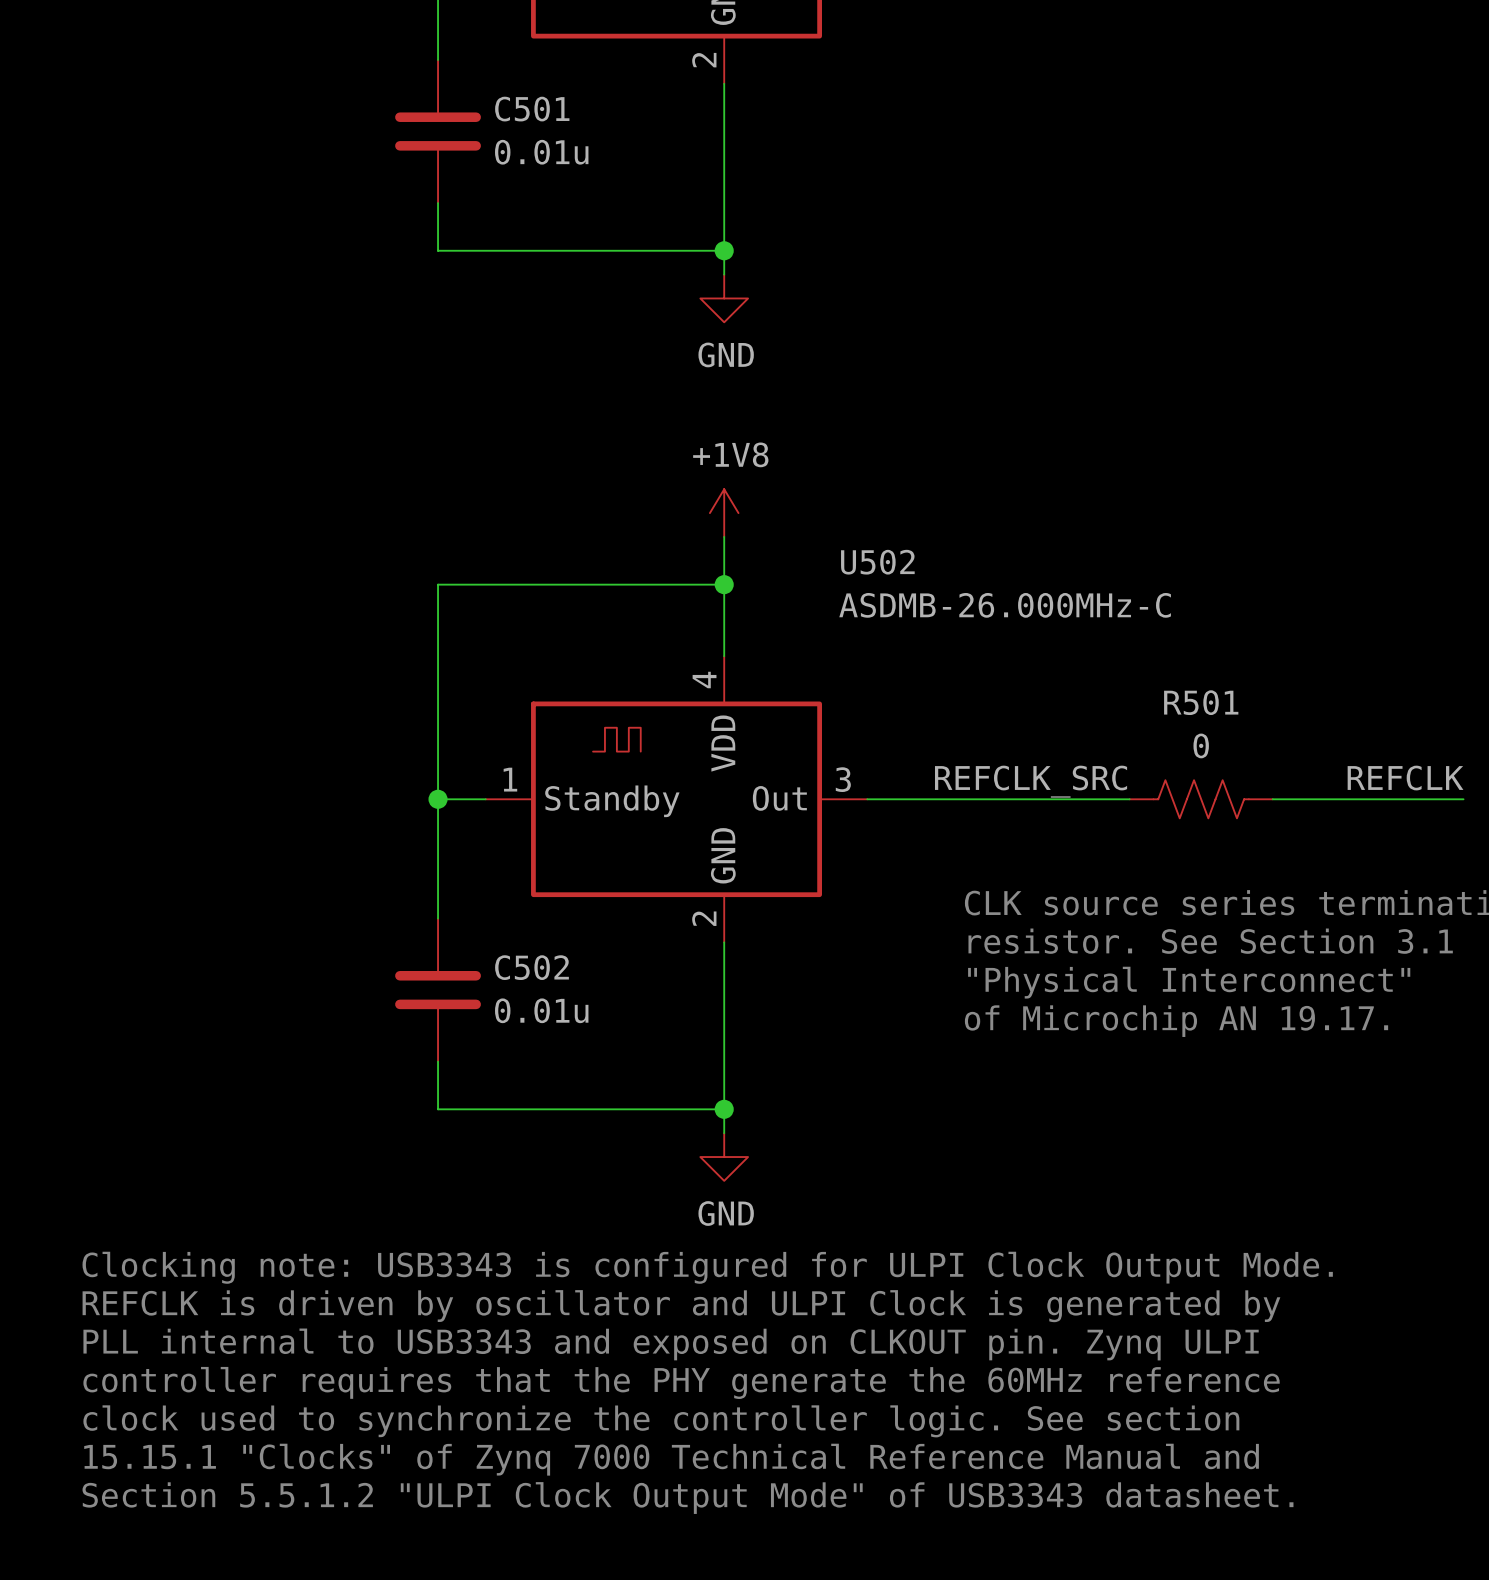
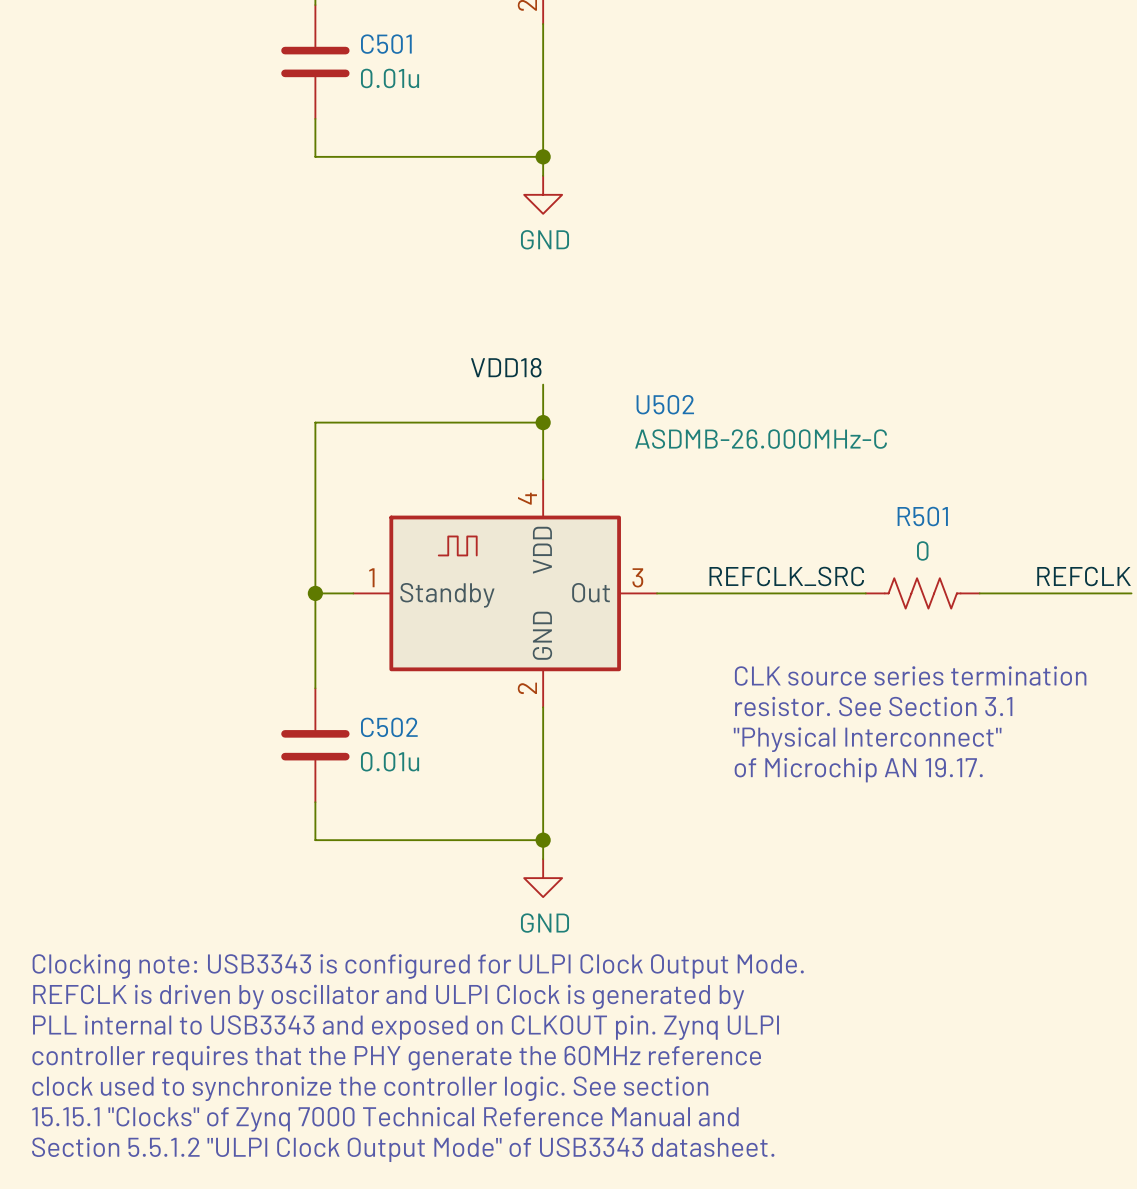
power symbol: +1V8 (724, 513) -> none
label: none -> VDD18 (506, 367)

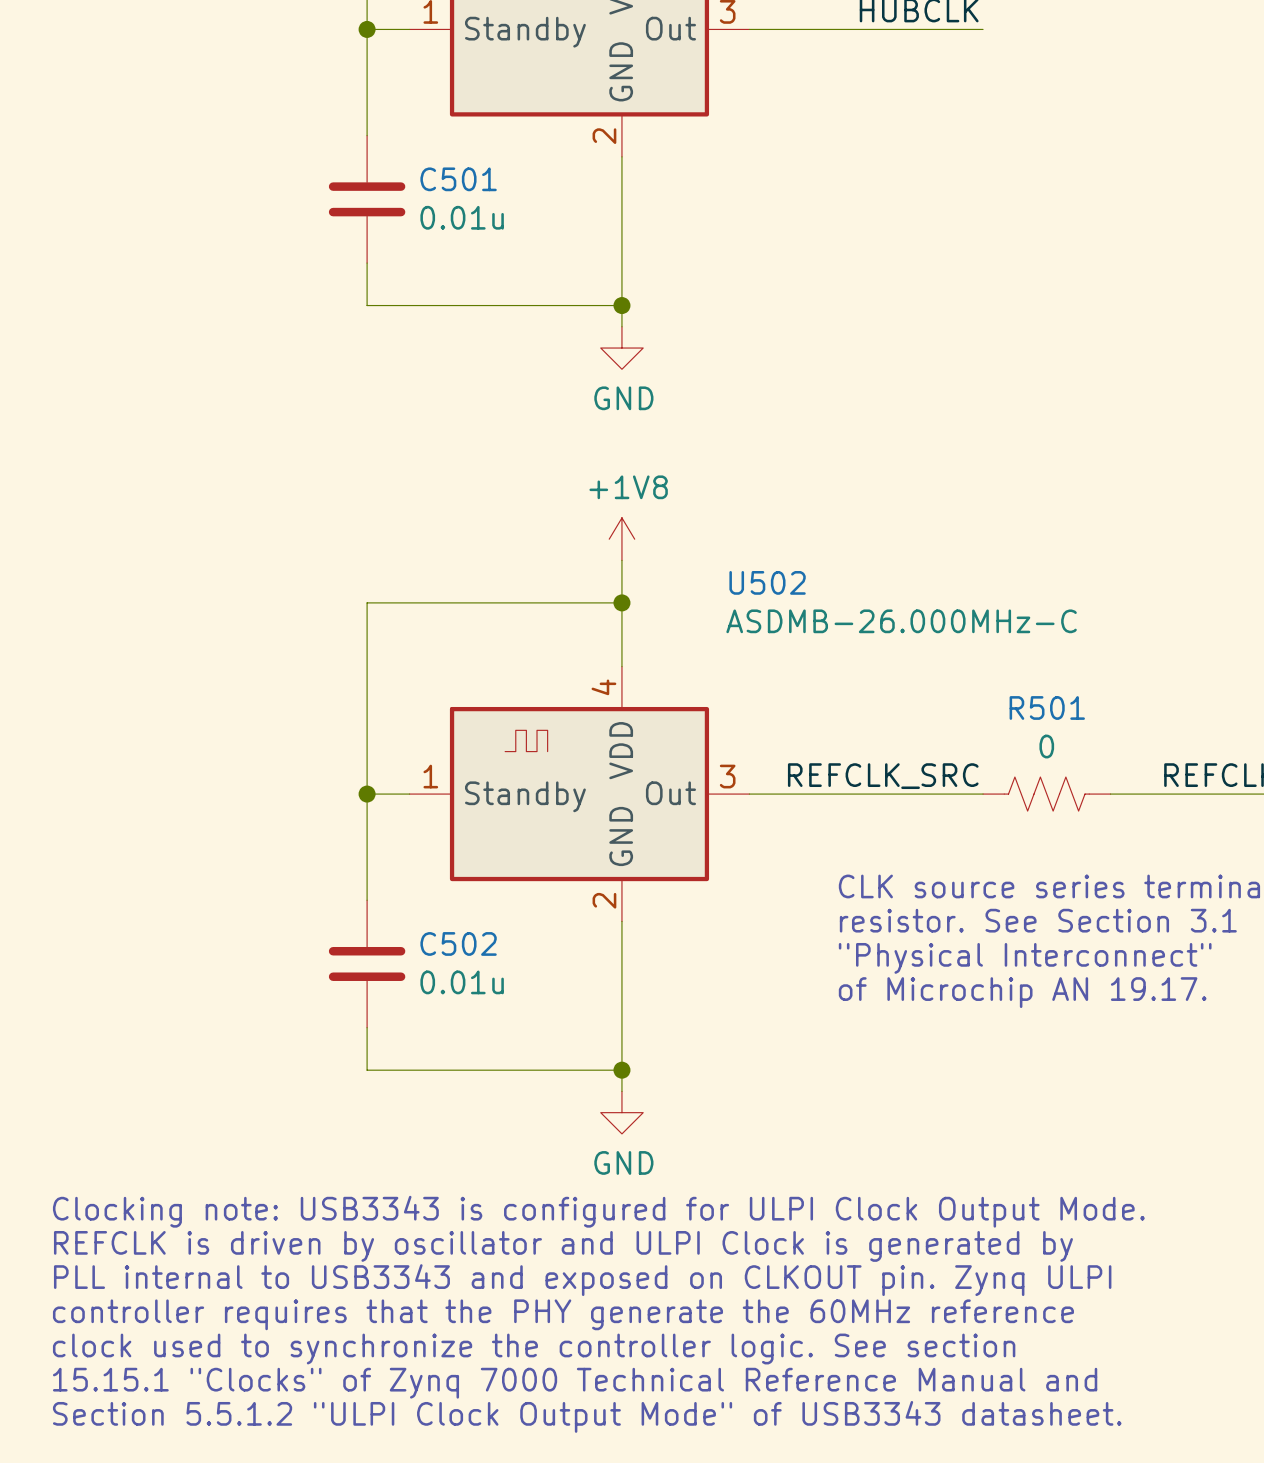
power symbol: none -> +1V8 (621, 539)
label: VDD18 (506, 367) -> none

